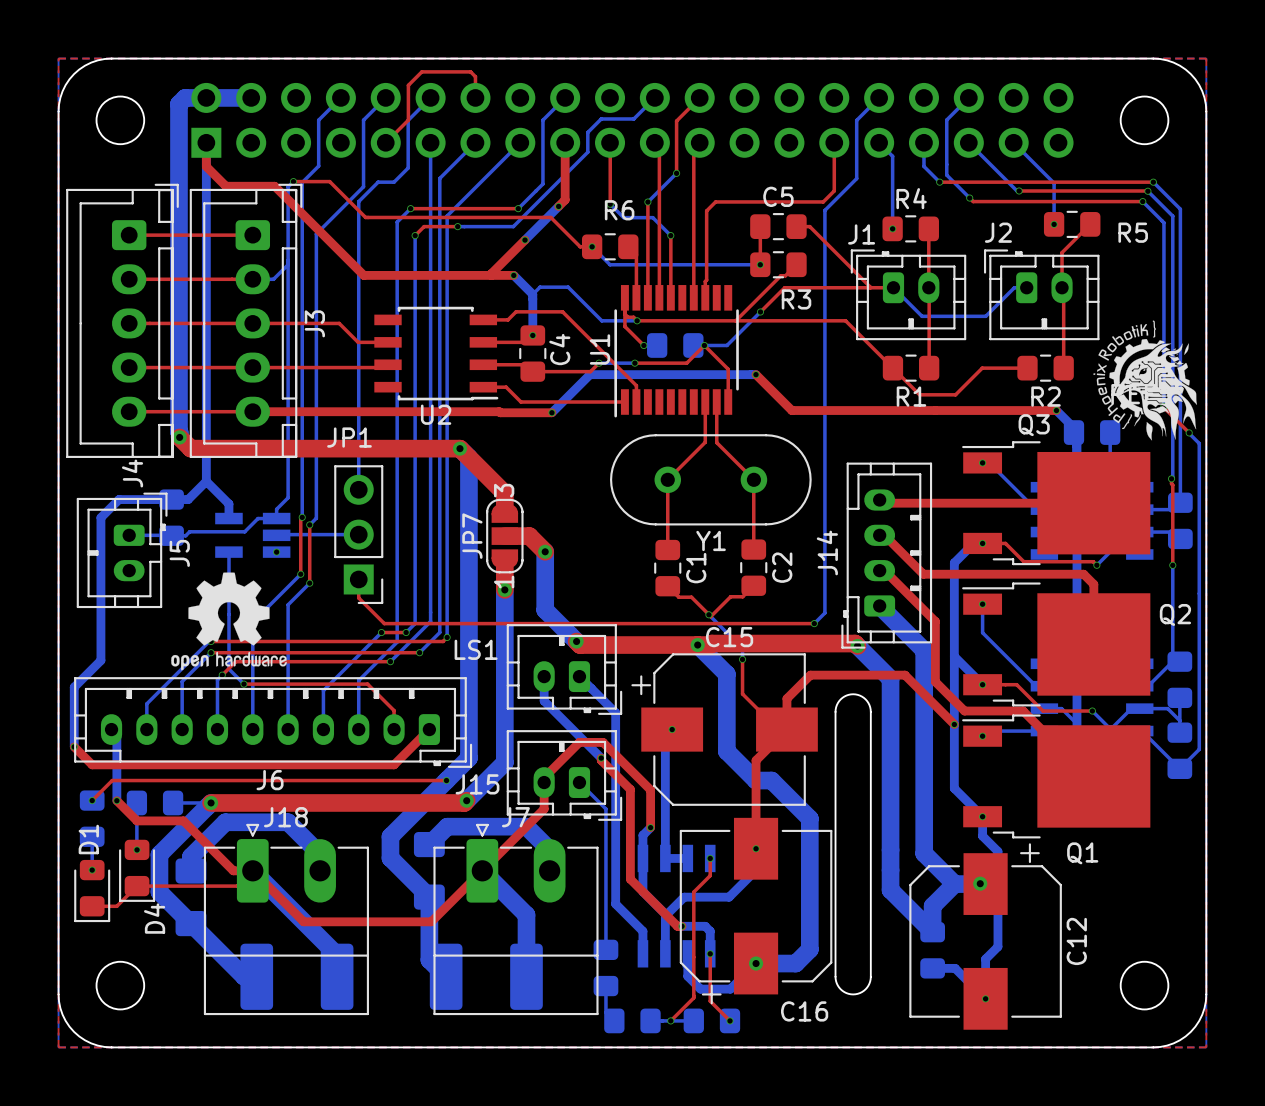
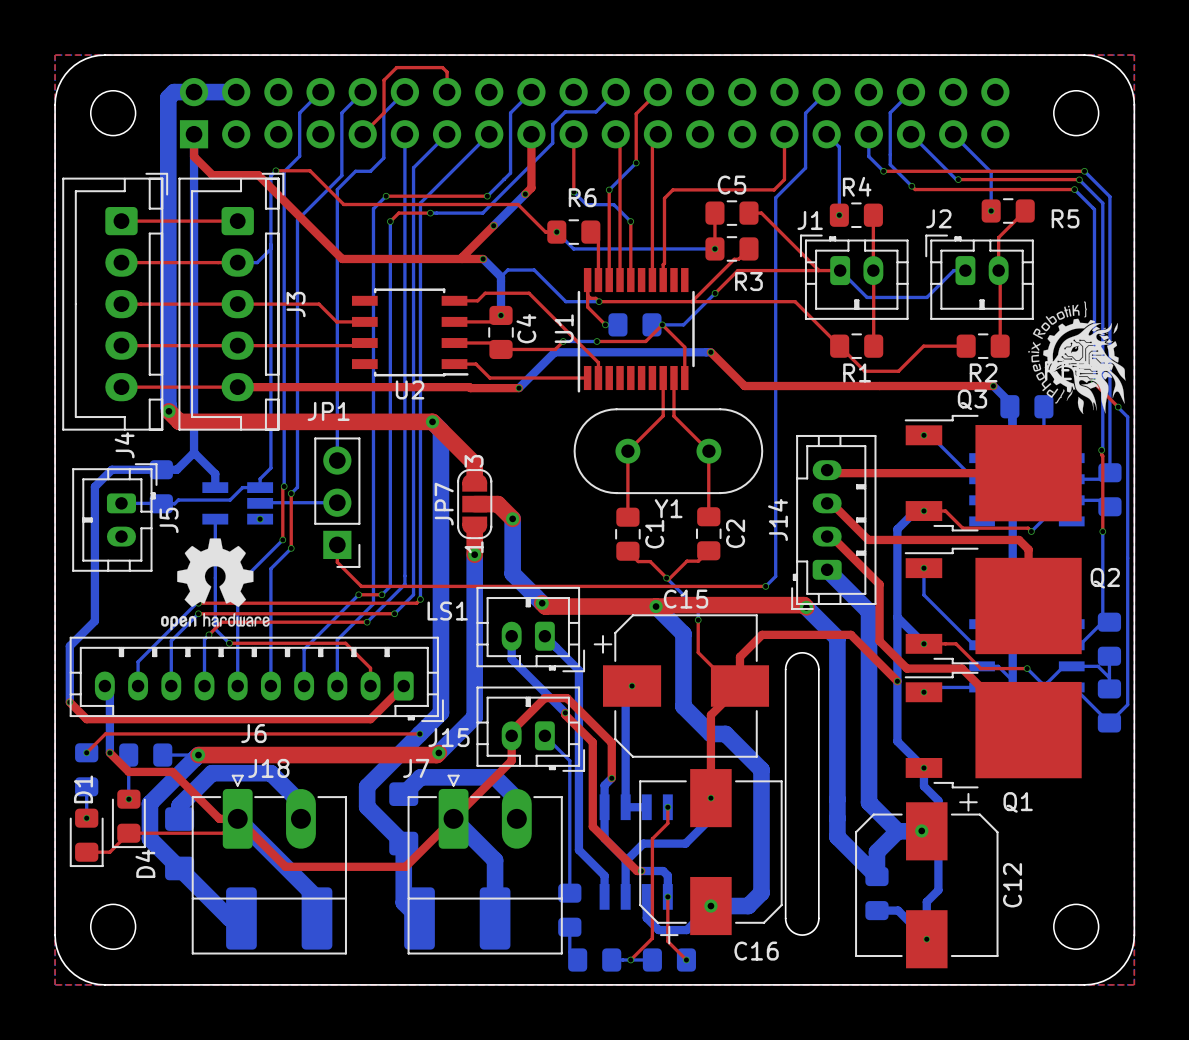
J7 name position: J7 (515, 817) -> J7 (416, 768)

